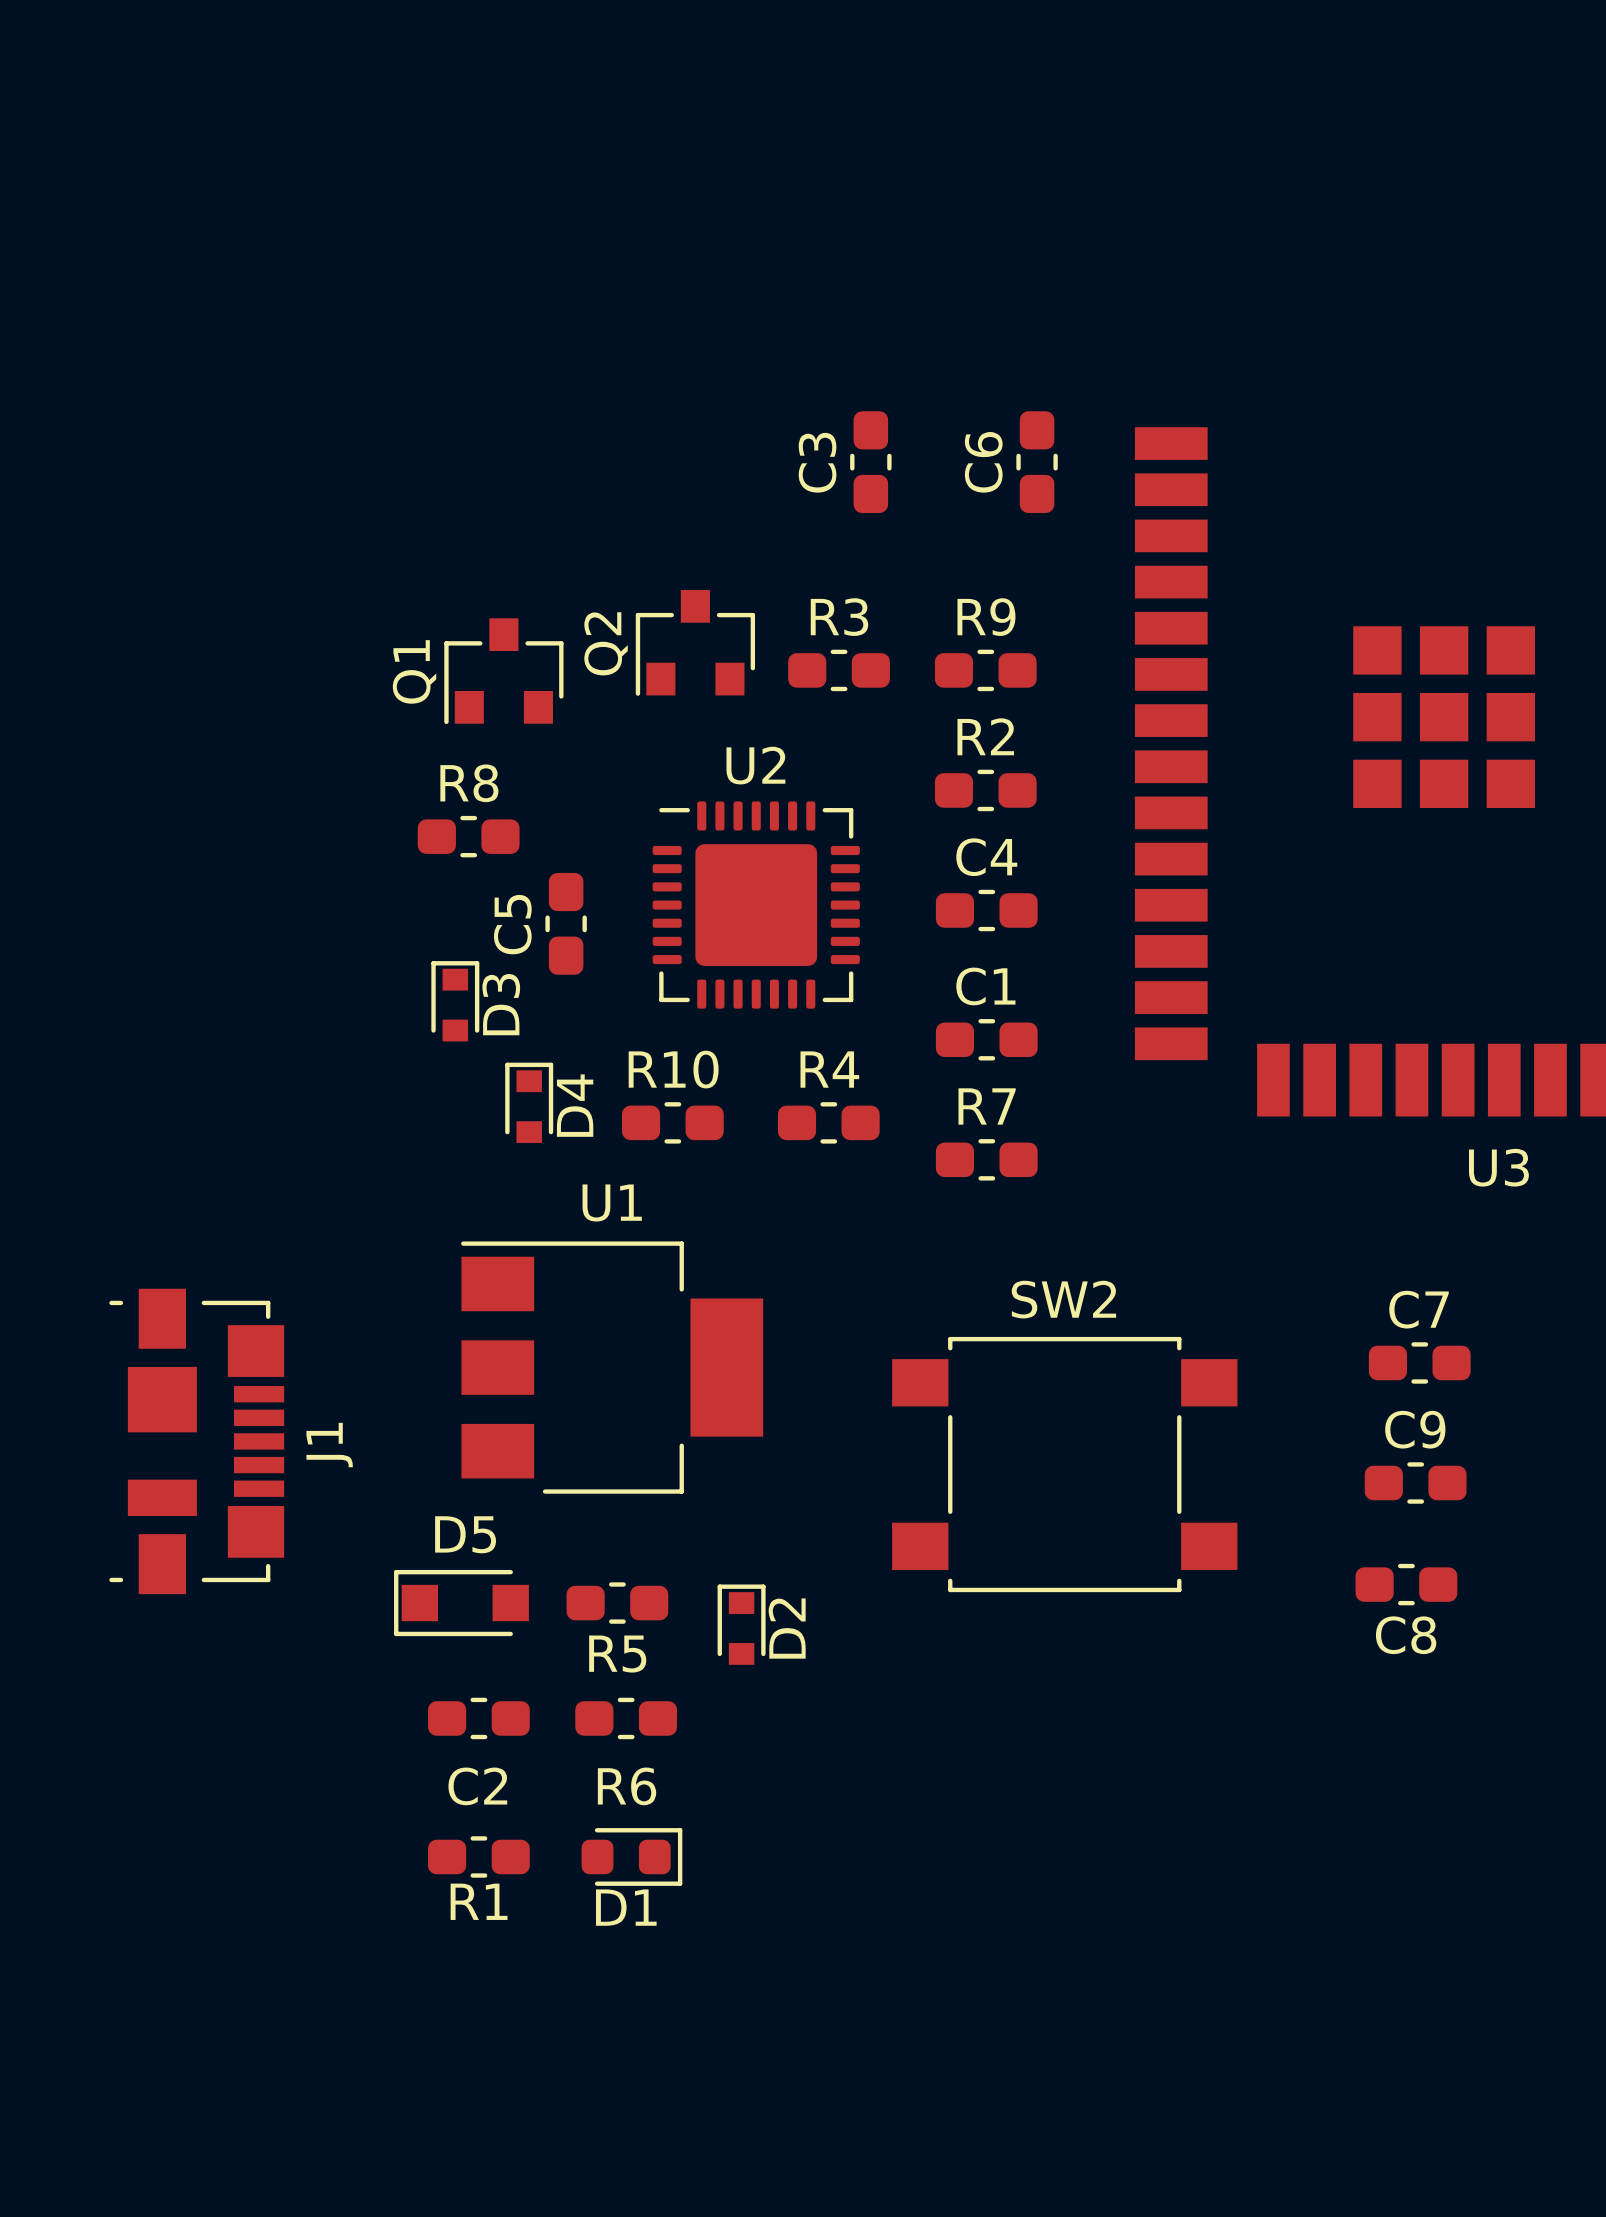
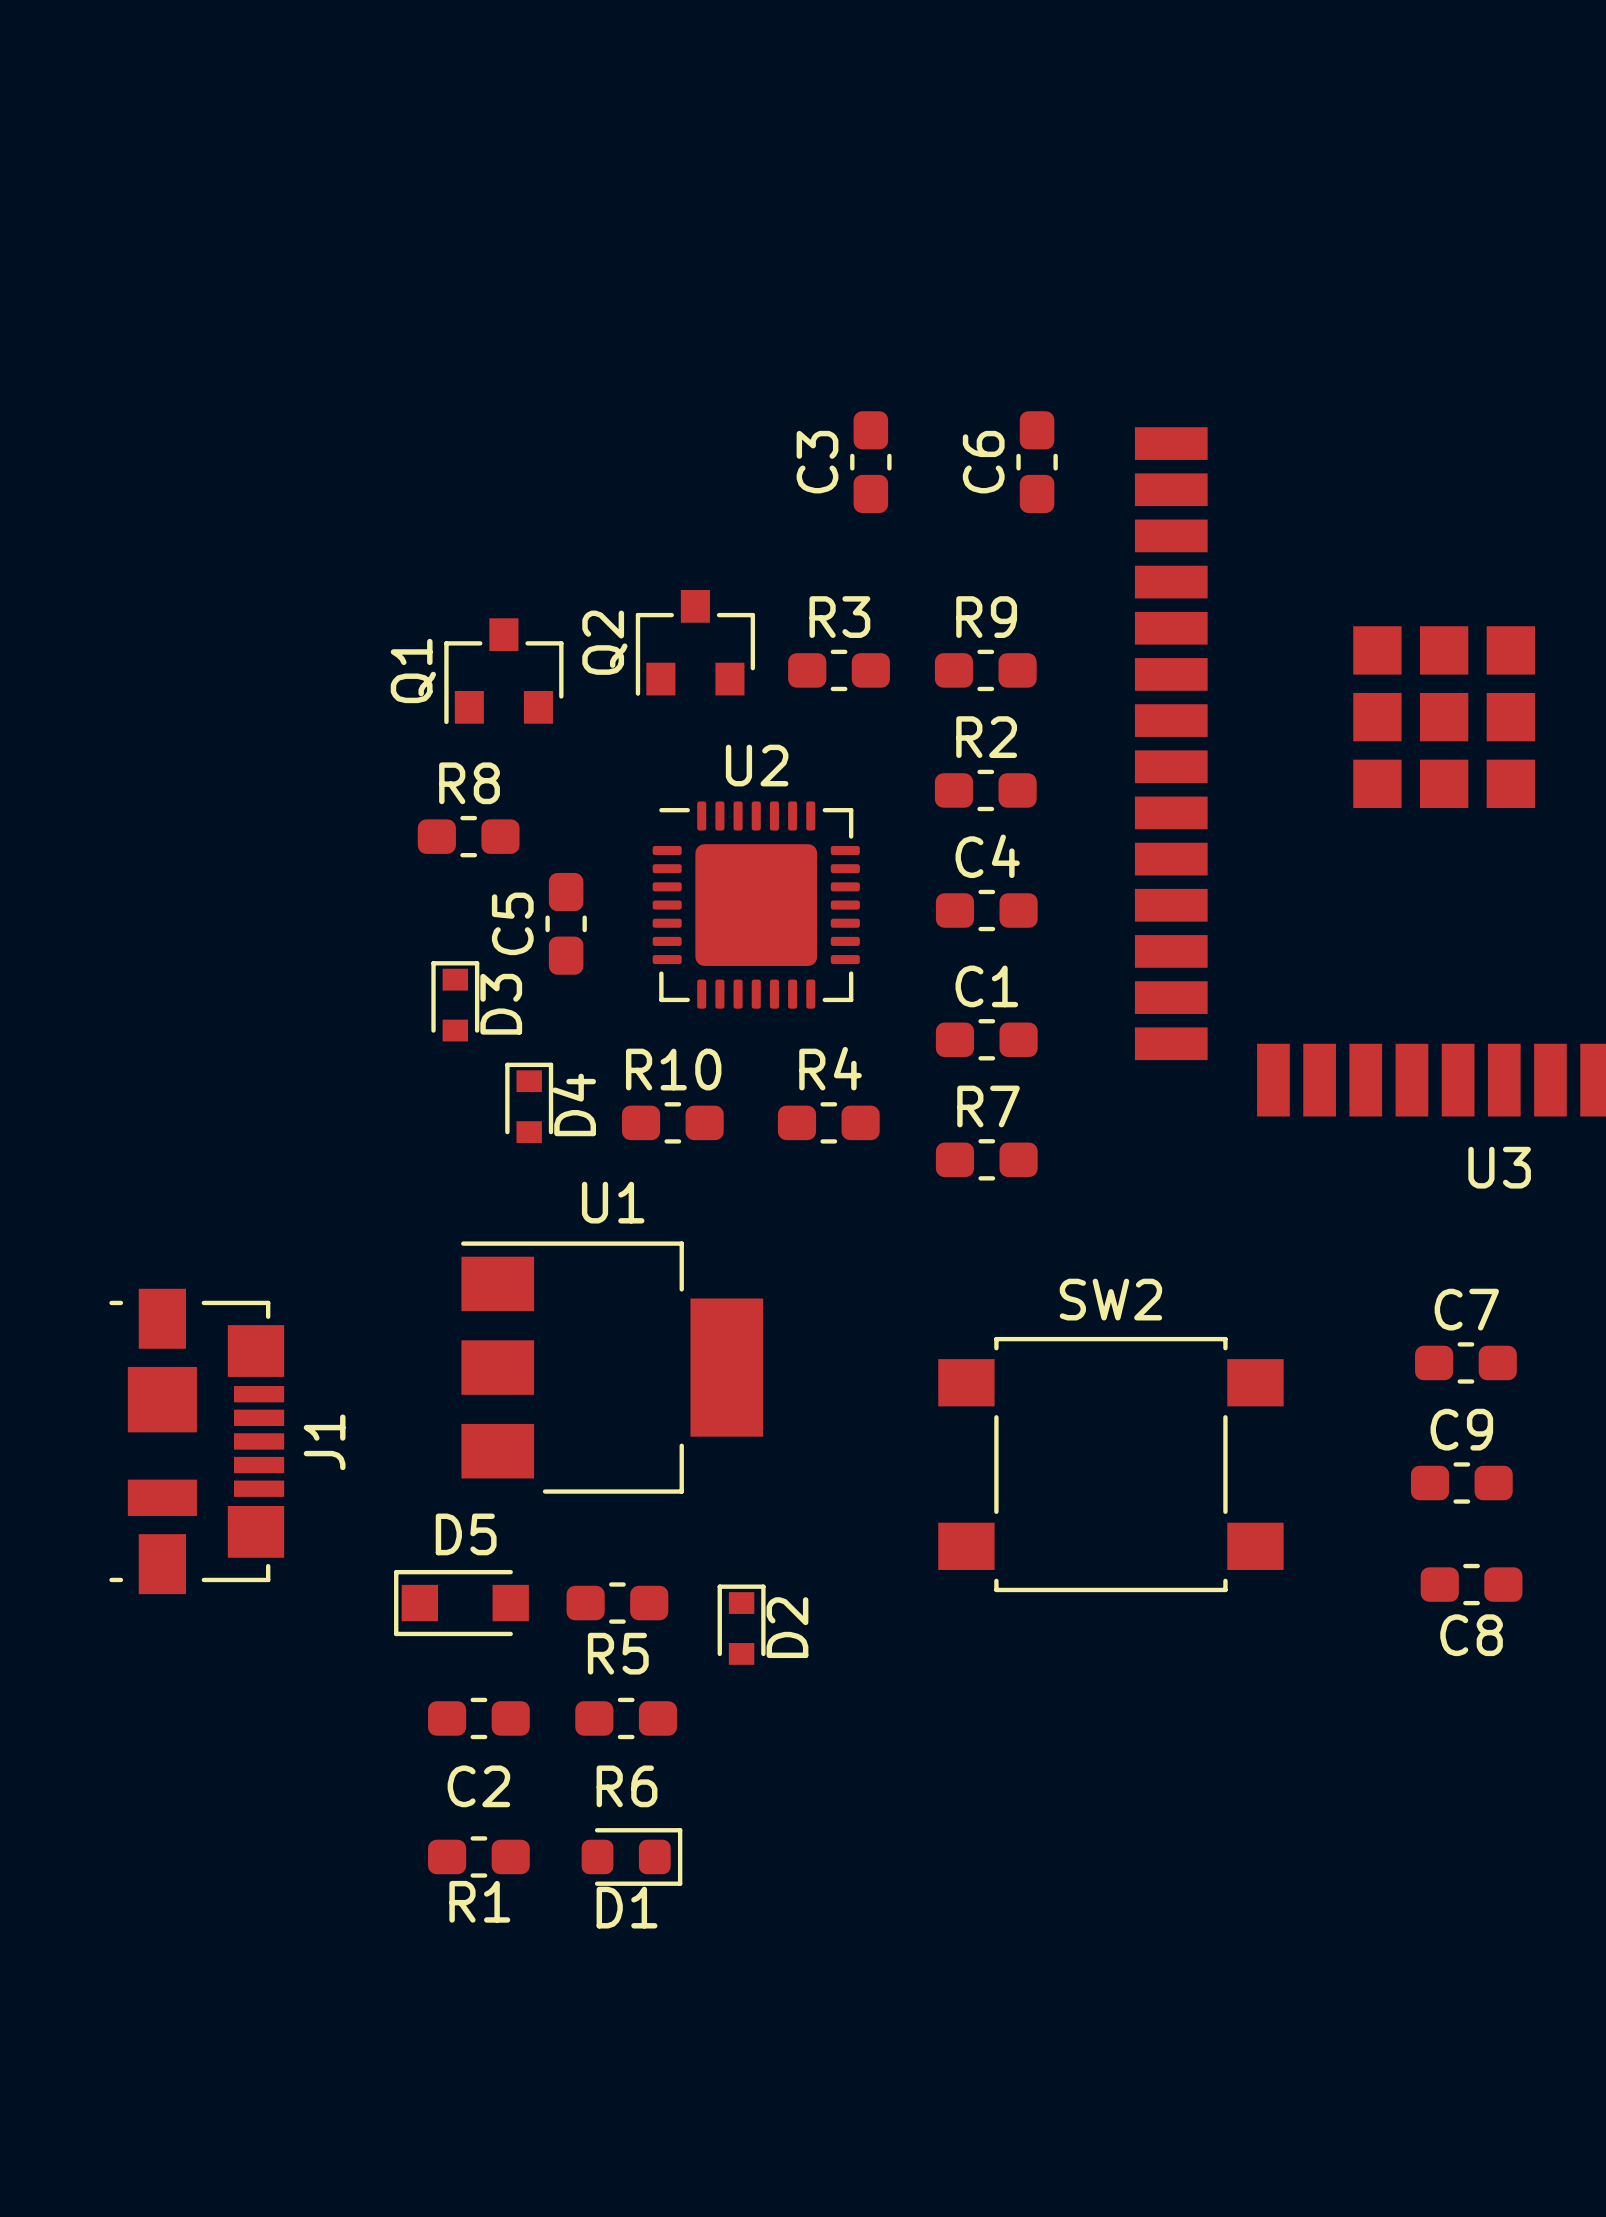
C7 position: (1419, 1362) -> (1465, 1362)
SW2 position: (1064, 1464) -> (1110, 1464)
C9 position: (1415, 1483) -> (1461, 1483)
C8 position: (1406, 1584) -> (1471, 1584)

